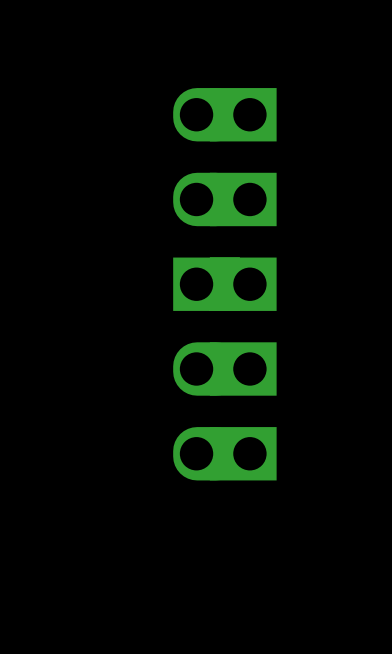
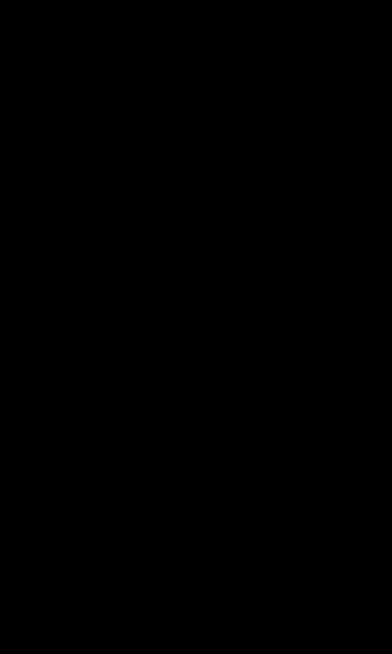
part: (224, 284) -> none

